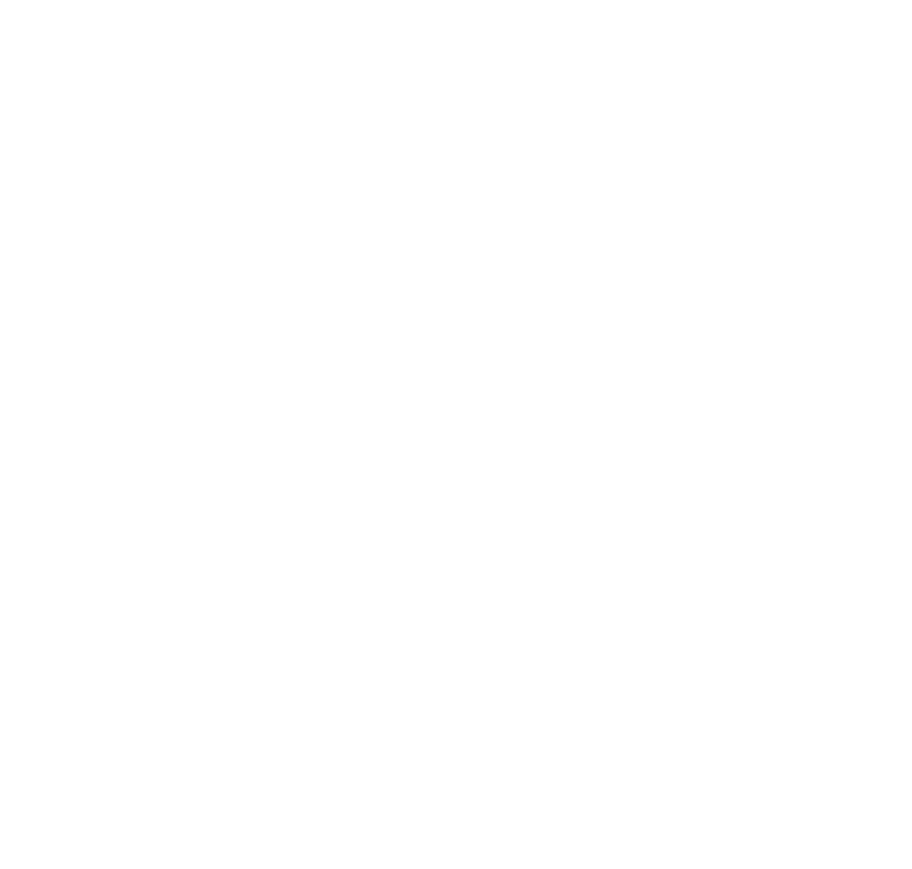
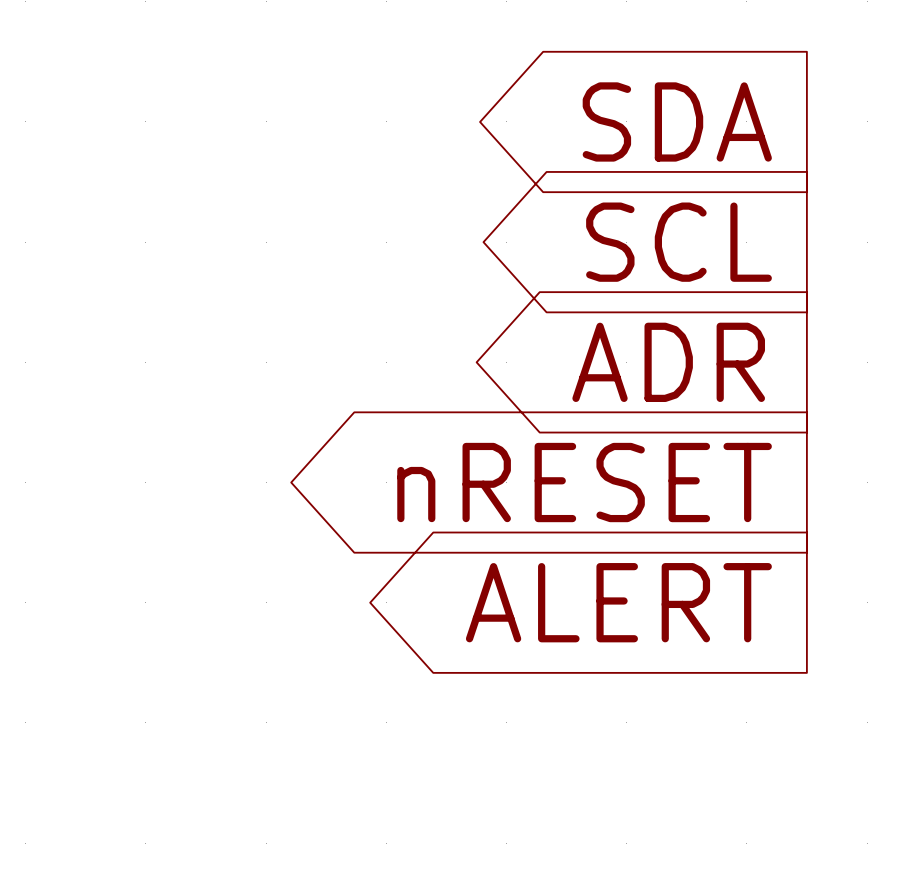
global label: none -> SDA (677, 121)
global label: none -> SCL (678, 242)
global label: none -> ADR (668, 362)
global label: none -> nRESET (584, 482)
global label: none -> ALERT (618, 602)

